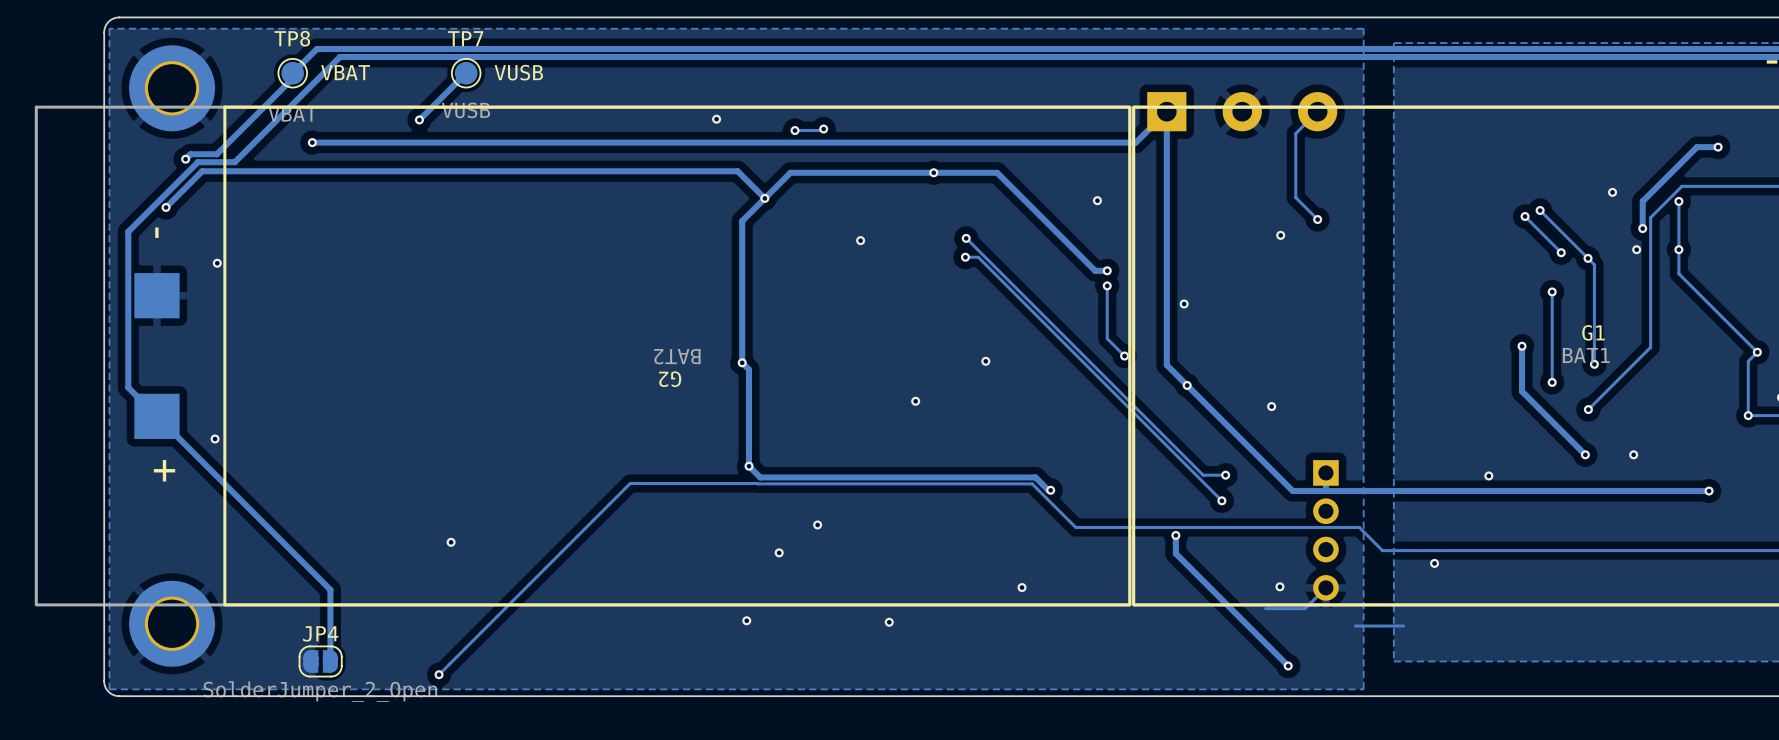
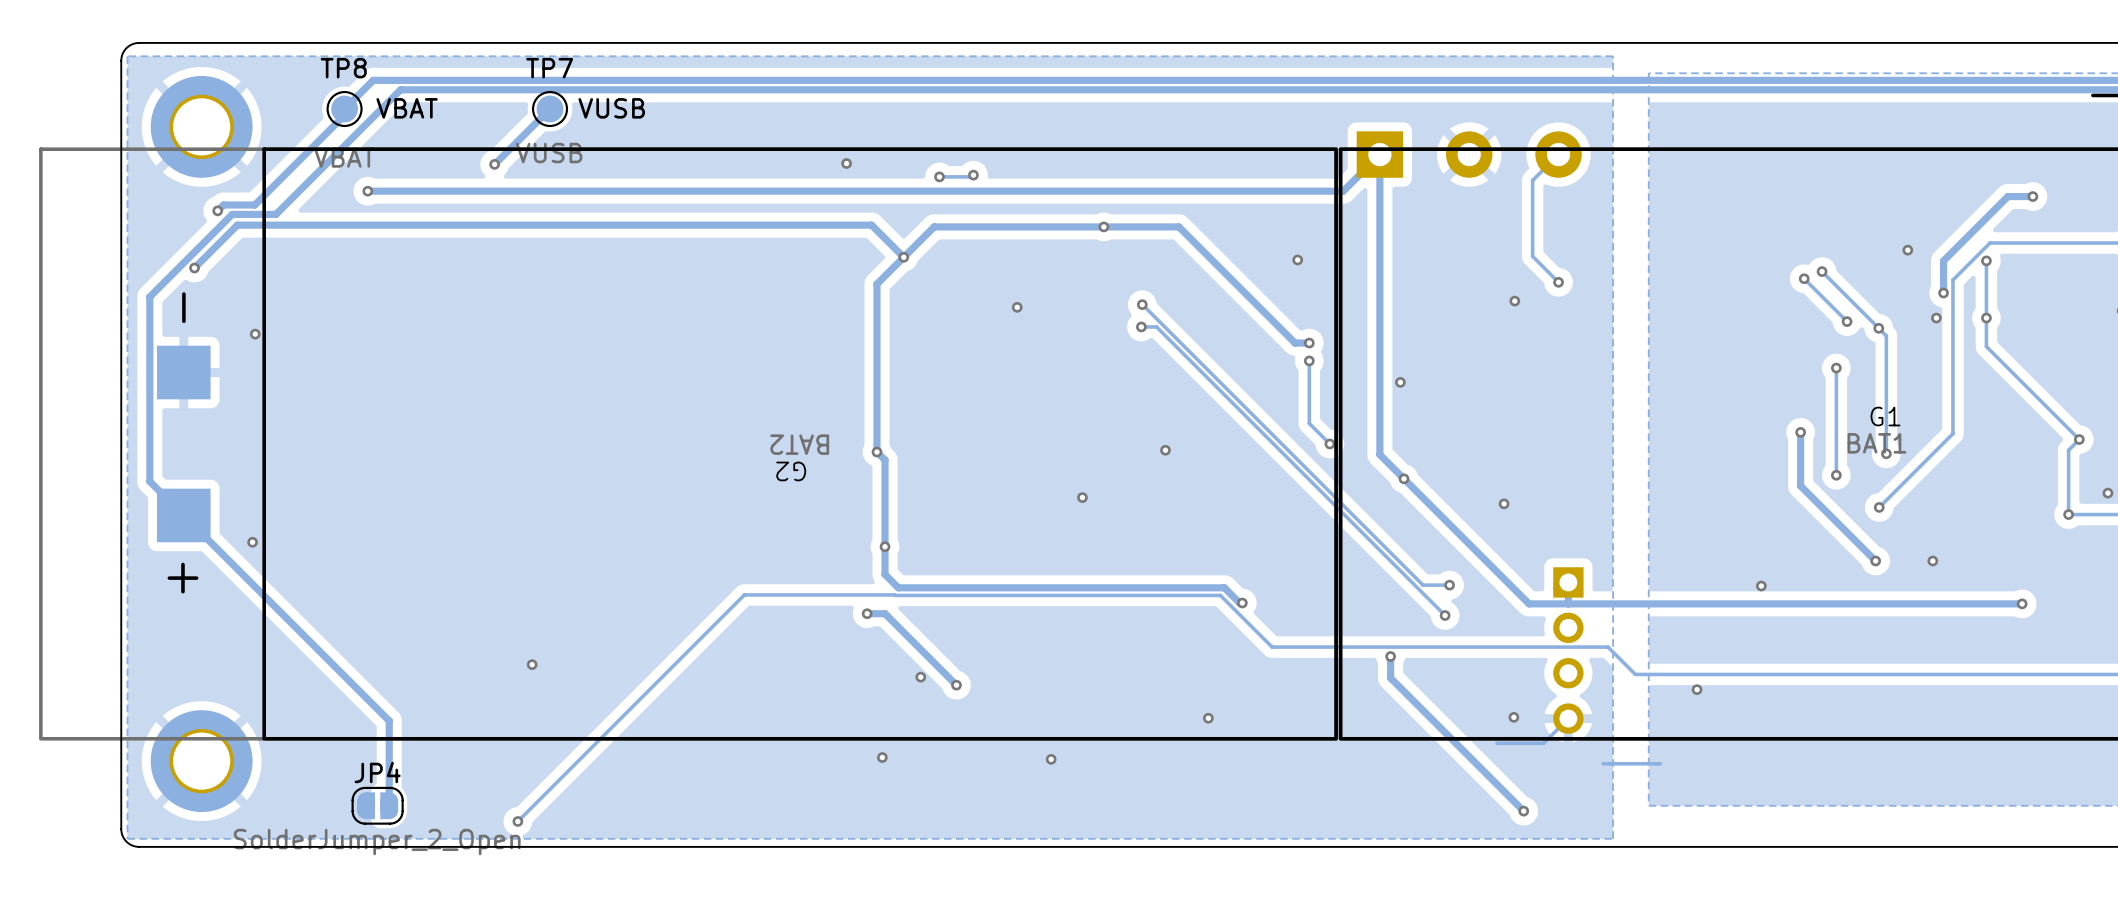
via: none -> (885, 546)
via: (749, 466) -> none
track: none -> (867, 613) (885, 613) (956, 685)
via: none -> (867, 613)
via position: (817, 524) -> (956, 685)

